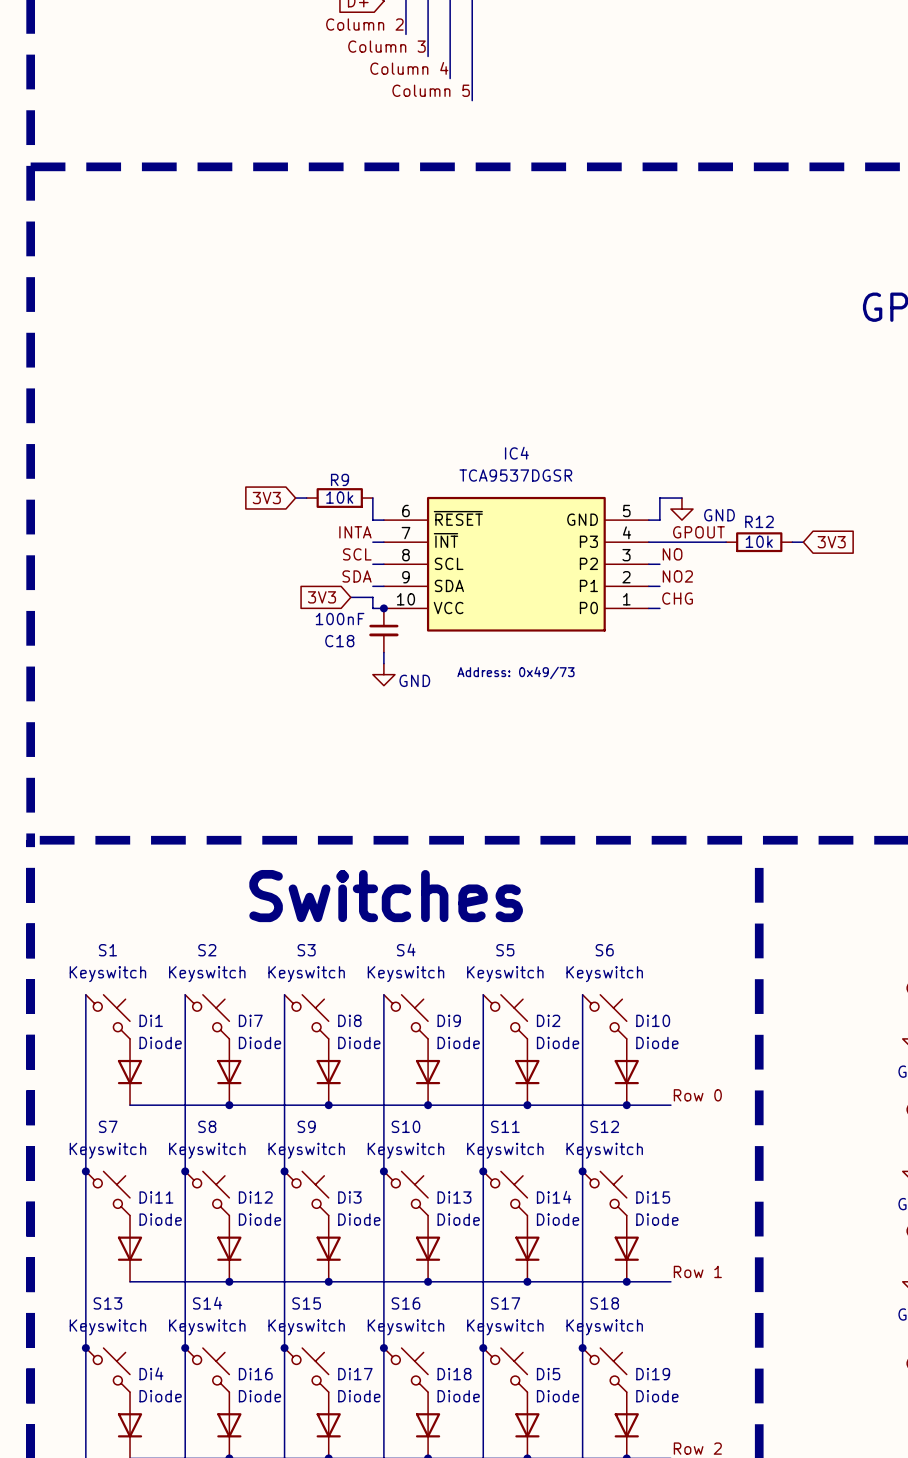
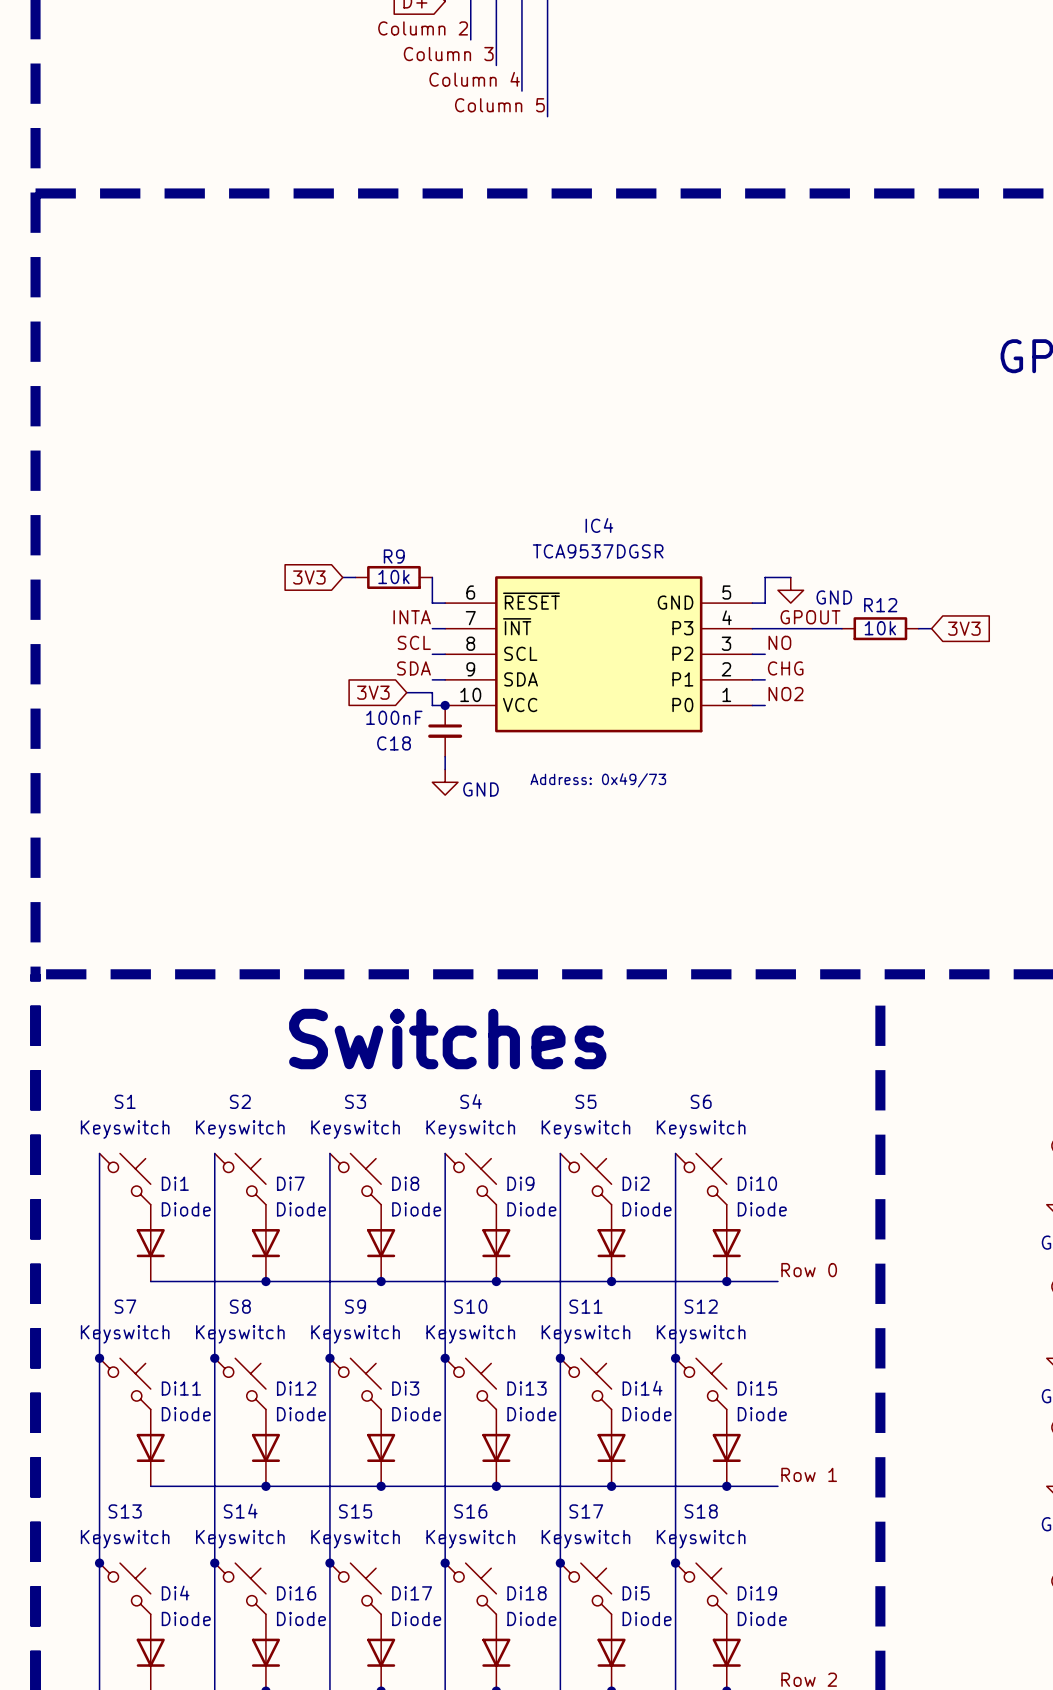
label: NO2 (677, 576) -> CHG (785, 668)
label: CHG (677, 598) -> NO2 (785, 694)

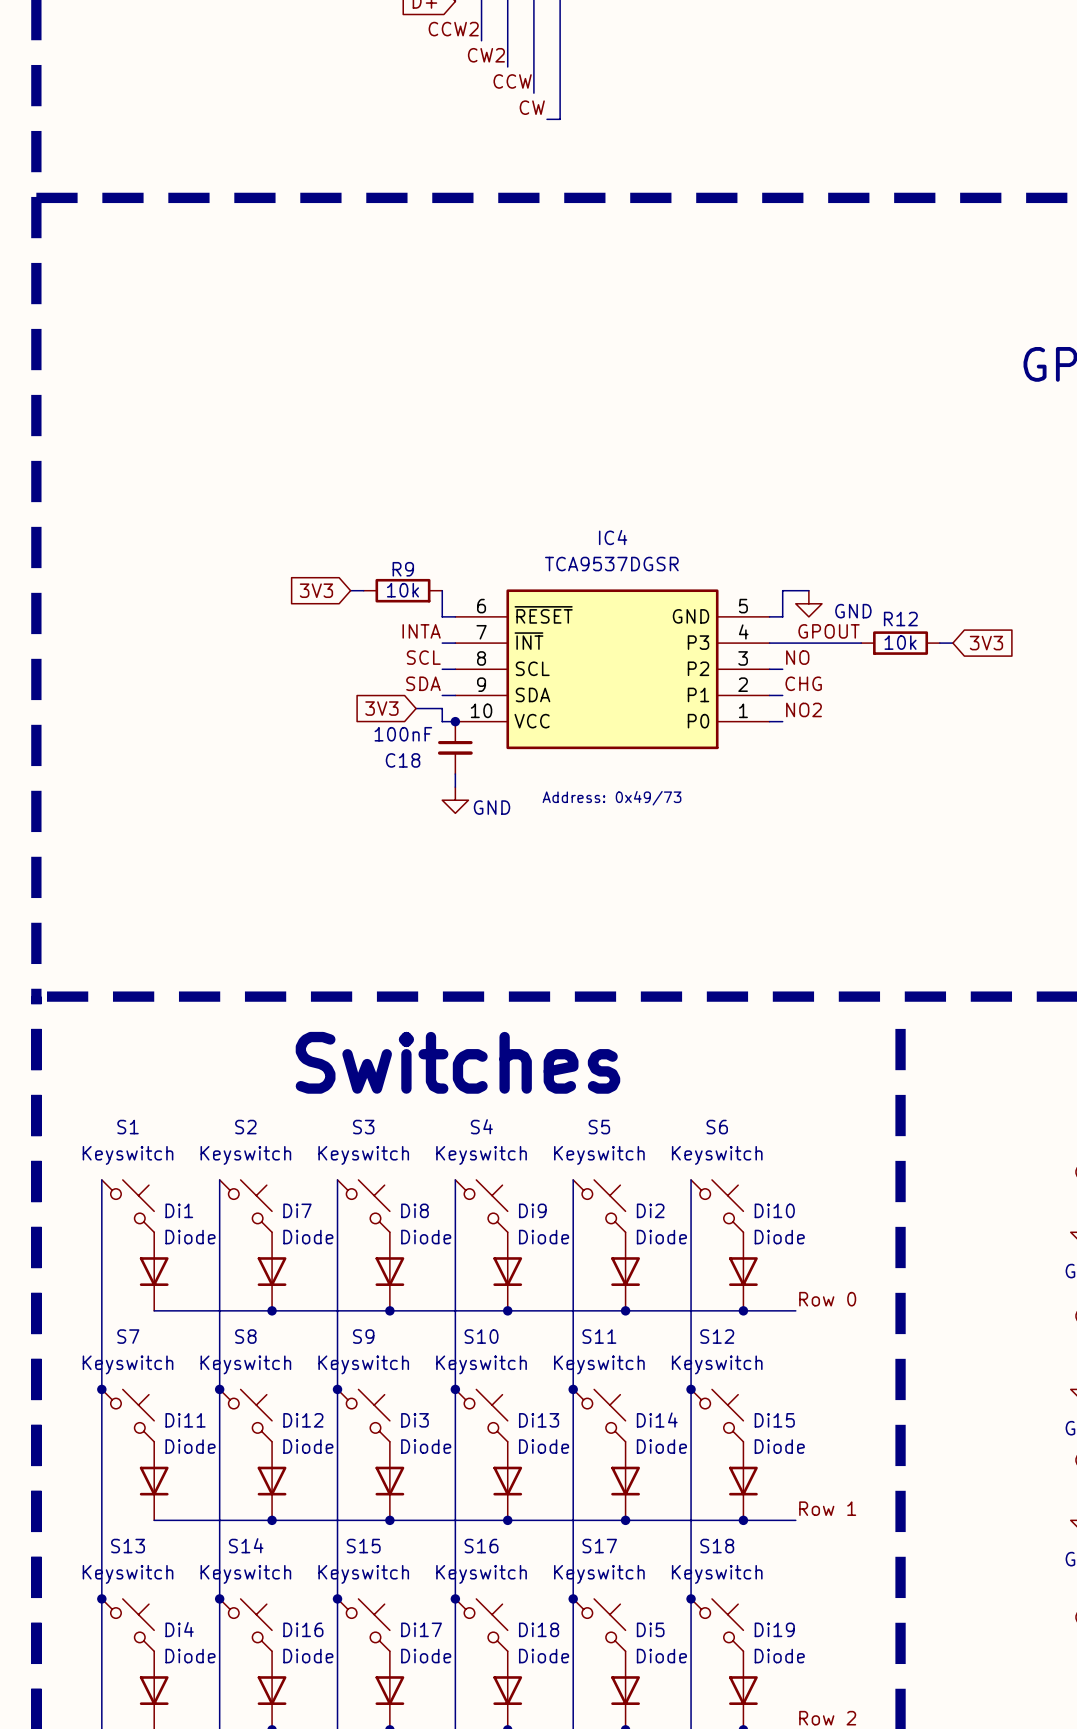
label: Column 2 (423, 28) -> CCW2 (453, 29)
label: Column 3 (448, 54) -> CW2 (486, 55)
label: Column 4 (474, 79) -> CCW (512, 81)
label: Column 5 (499, 105) -> none
label: none -> CW (532, 107)
wire: none -> (547, 119) (560, 119)

